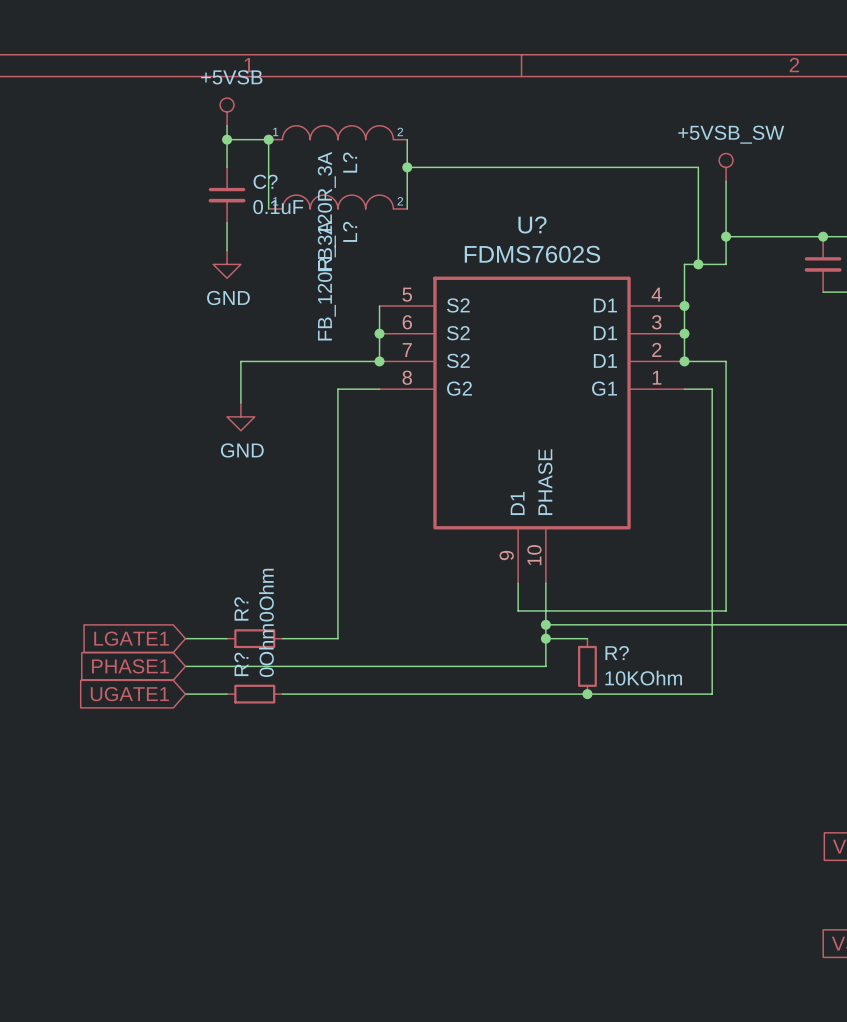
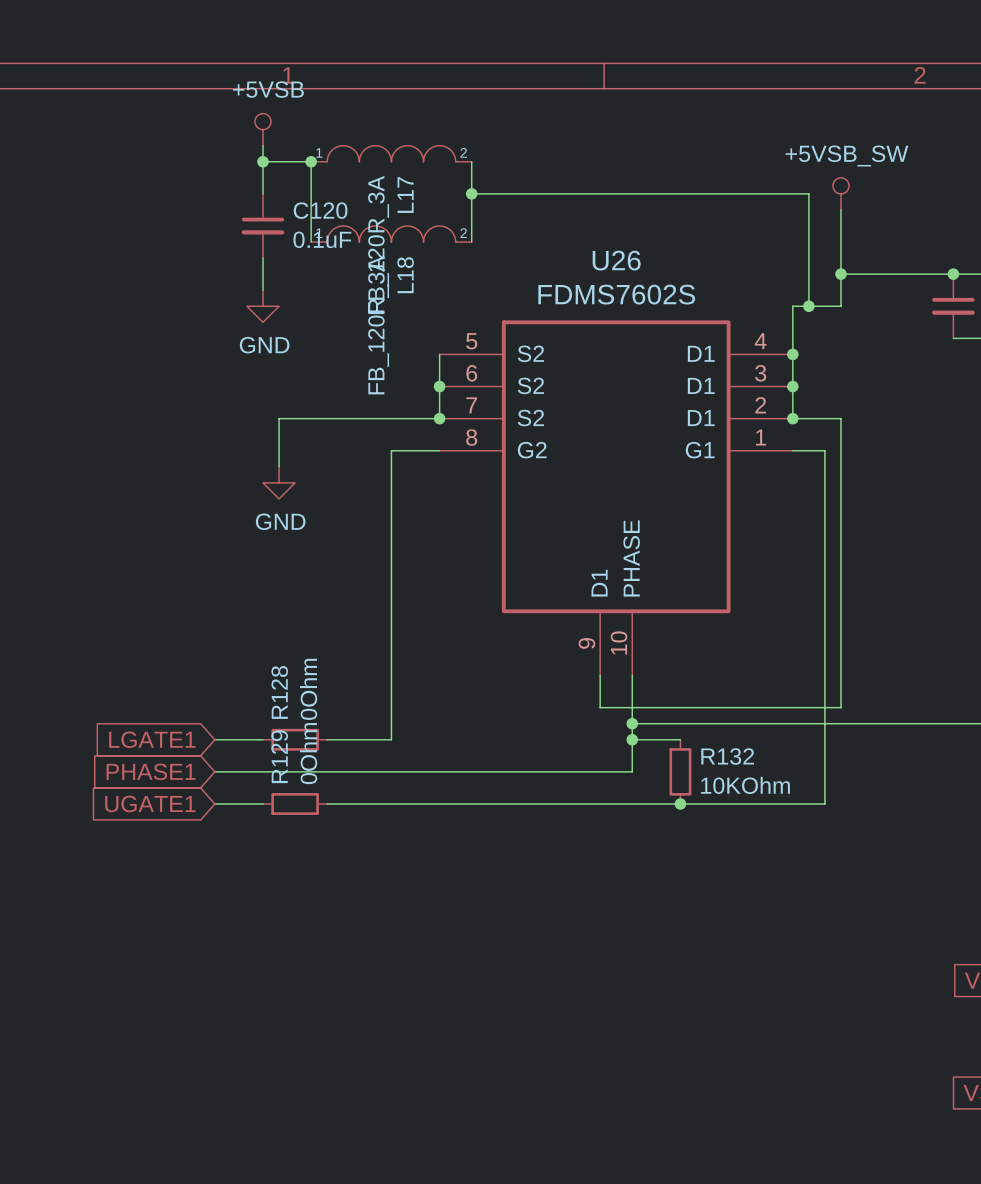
L? name: L? (350, 162) -> L17 (405, 194)
C? name: C? (265, 181) -> C120 (320, 210)
U? name: U? (532, 224) -> U26 (616, 260)
L? name: L? (350, 231) -> L18 (405, 275)
R? name: R? (241, 608) -> R128 (279, 692)
R? name: R? (617, 653) -> R132 (727, 756)
R? name: R? (241, 664) -> R129 (279, 756)

